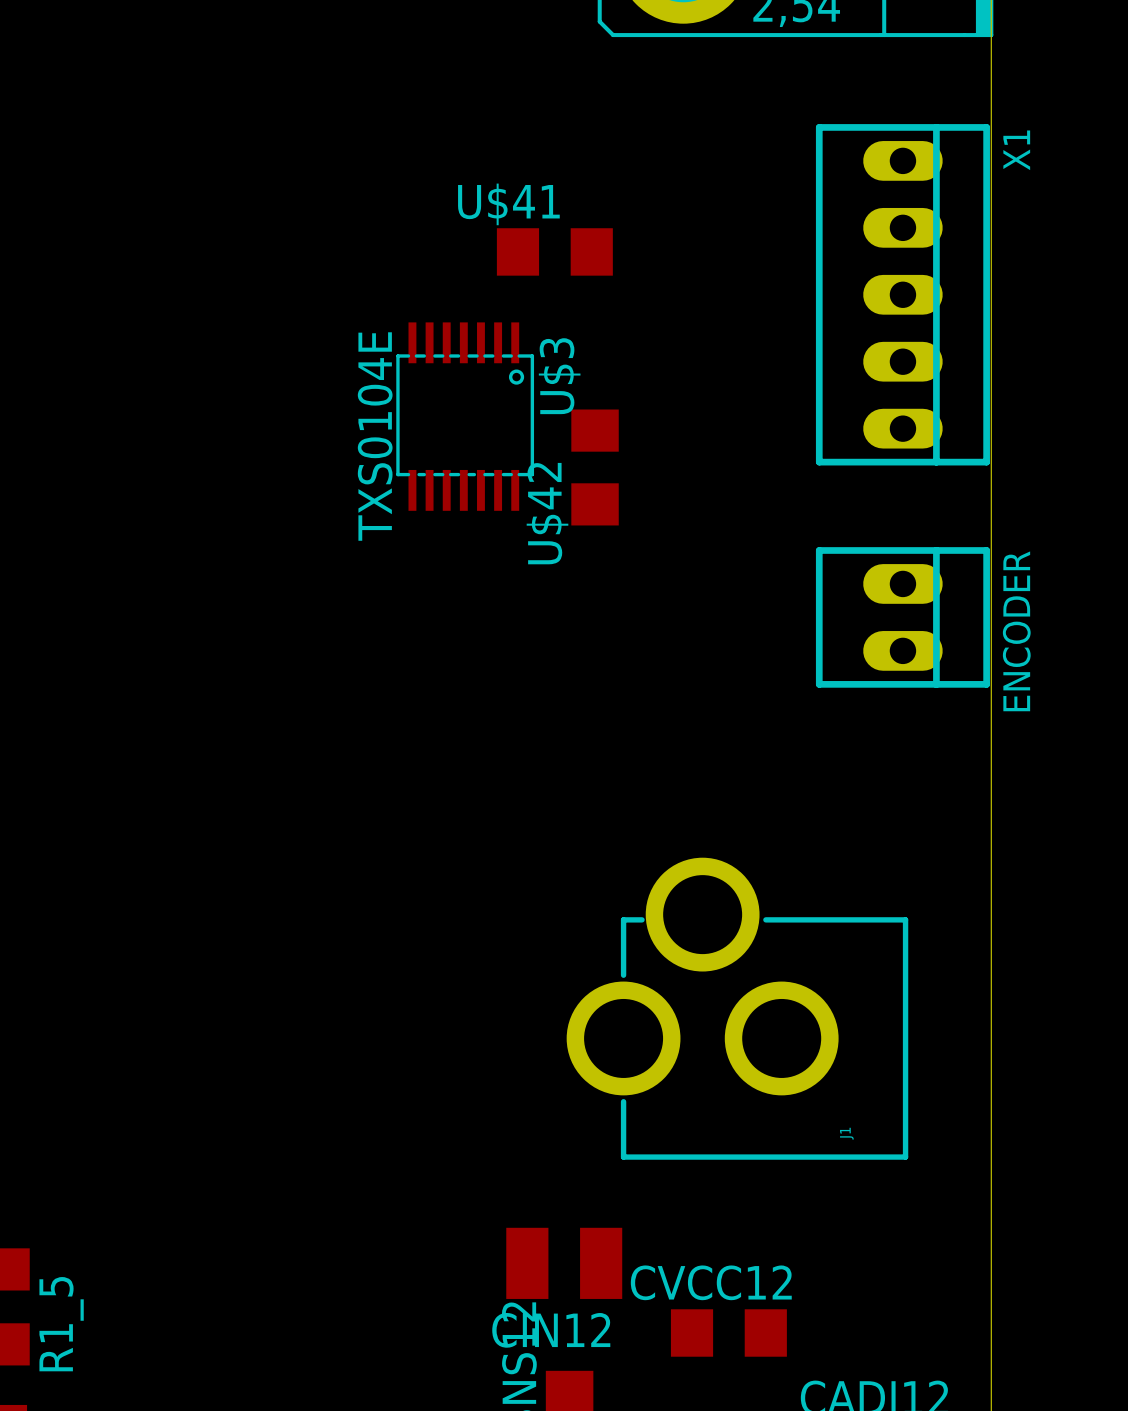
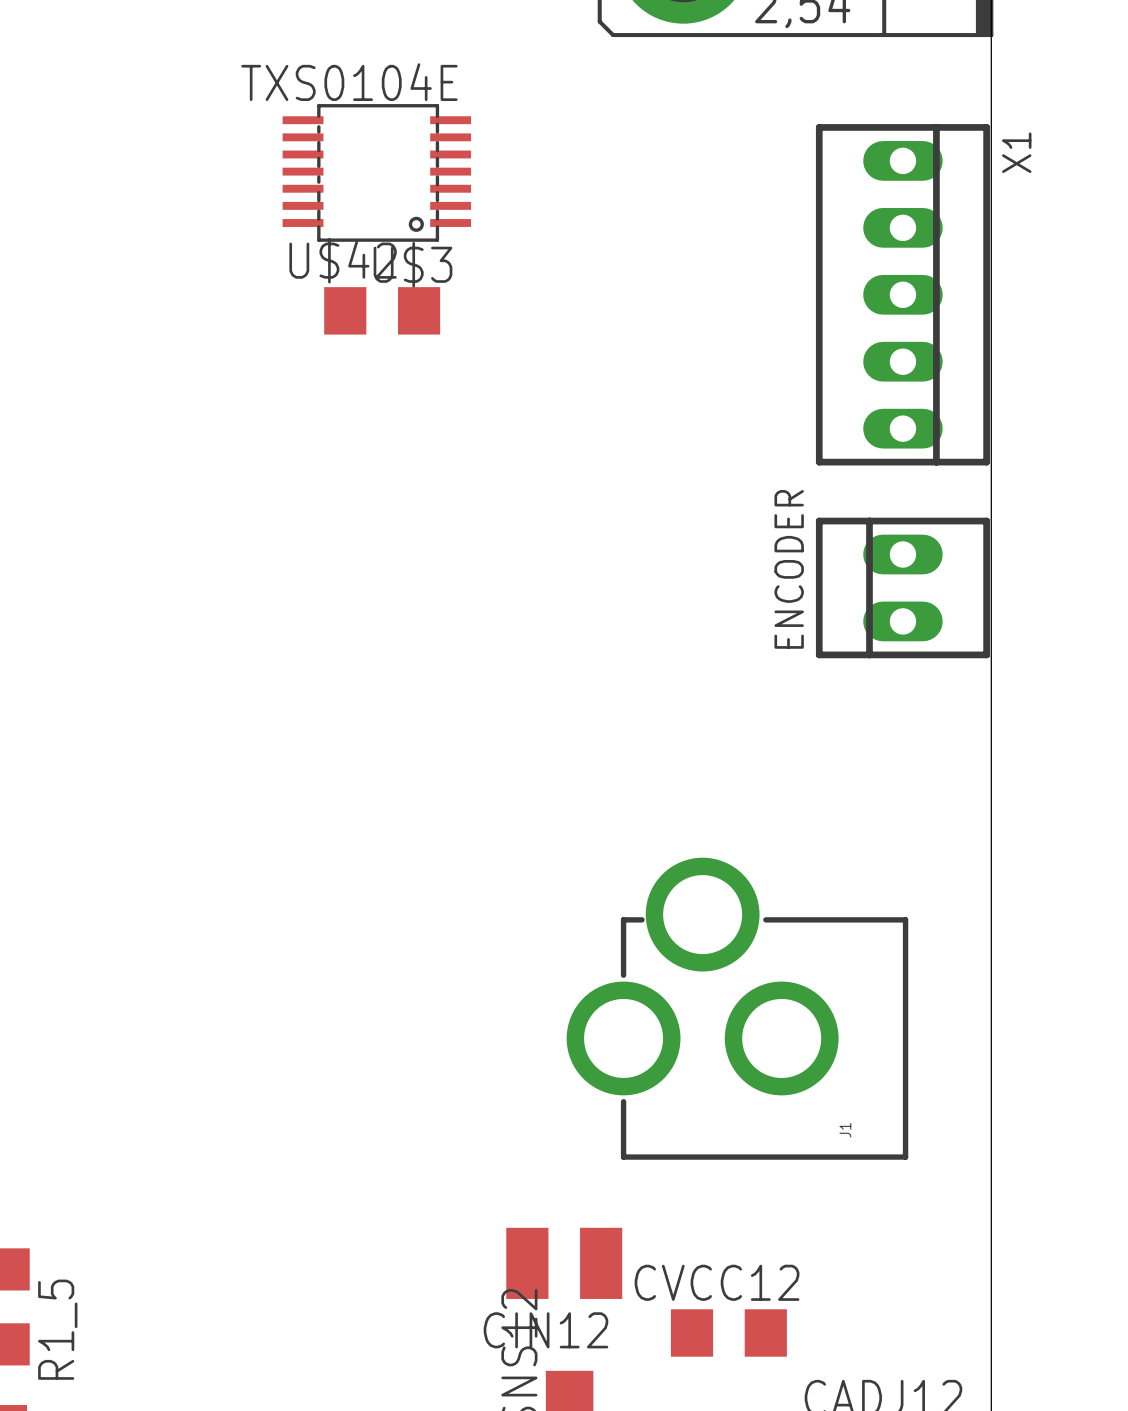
U$41: (554, 251) -> none
U$3 rotation: 0° (465, 416) -> 90° clockwise (376, 172)
U$3 position: (465, 416) -> (376, 172)
U$42 rotation: 0° (595, 467) -> 90° clockwise (382, 310)
U$42 position: (595, 467) -> (382, 310)
ENCODER rotation: 0° (902, 617) -> 180° (902, 587)

